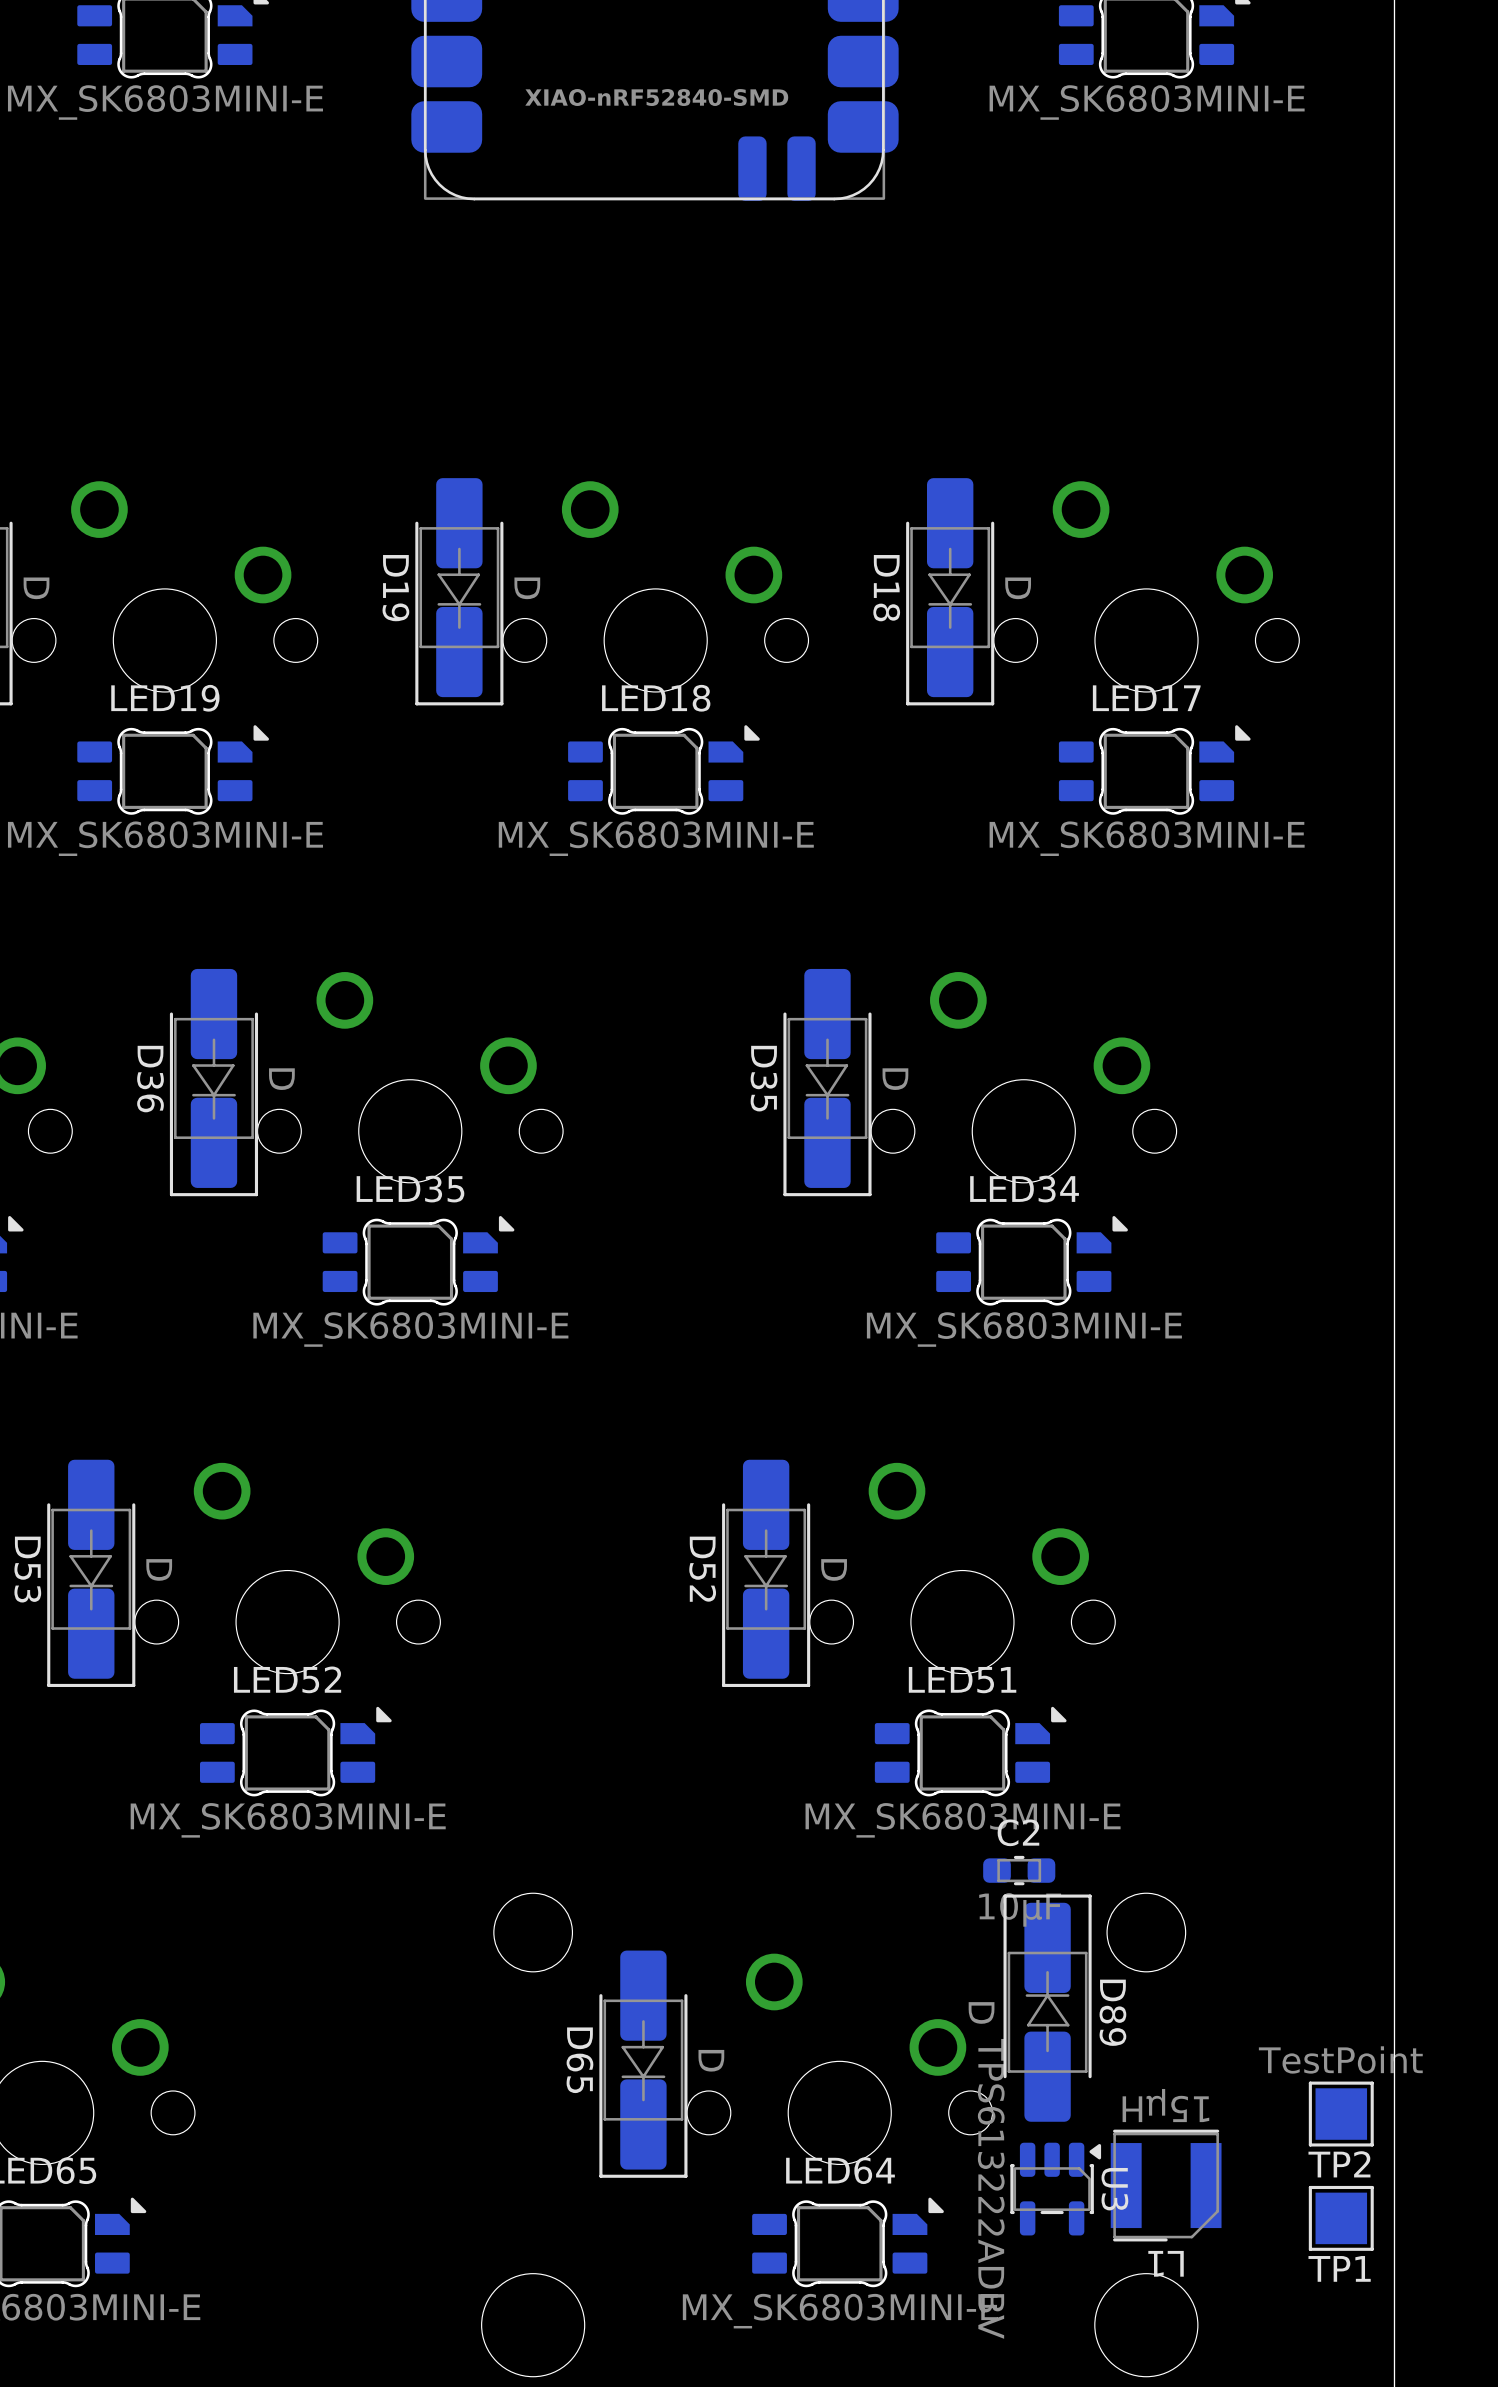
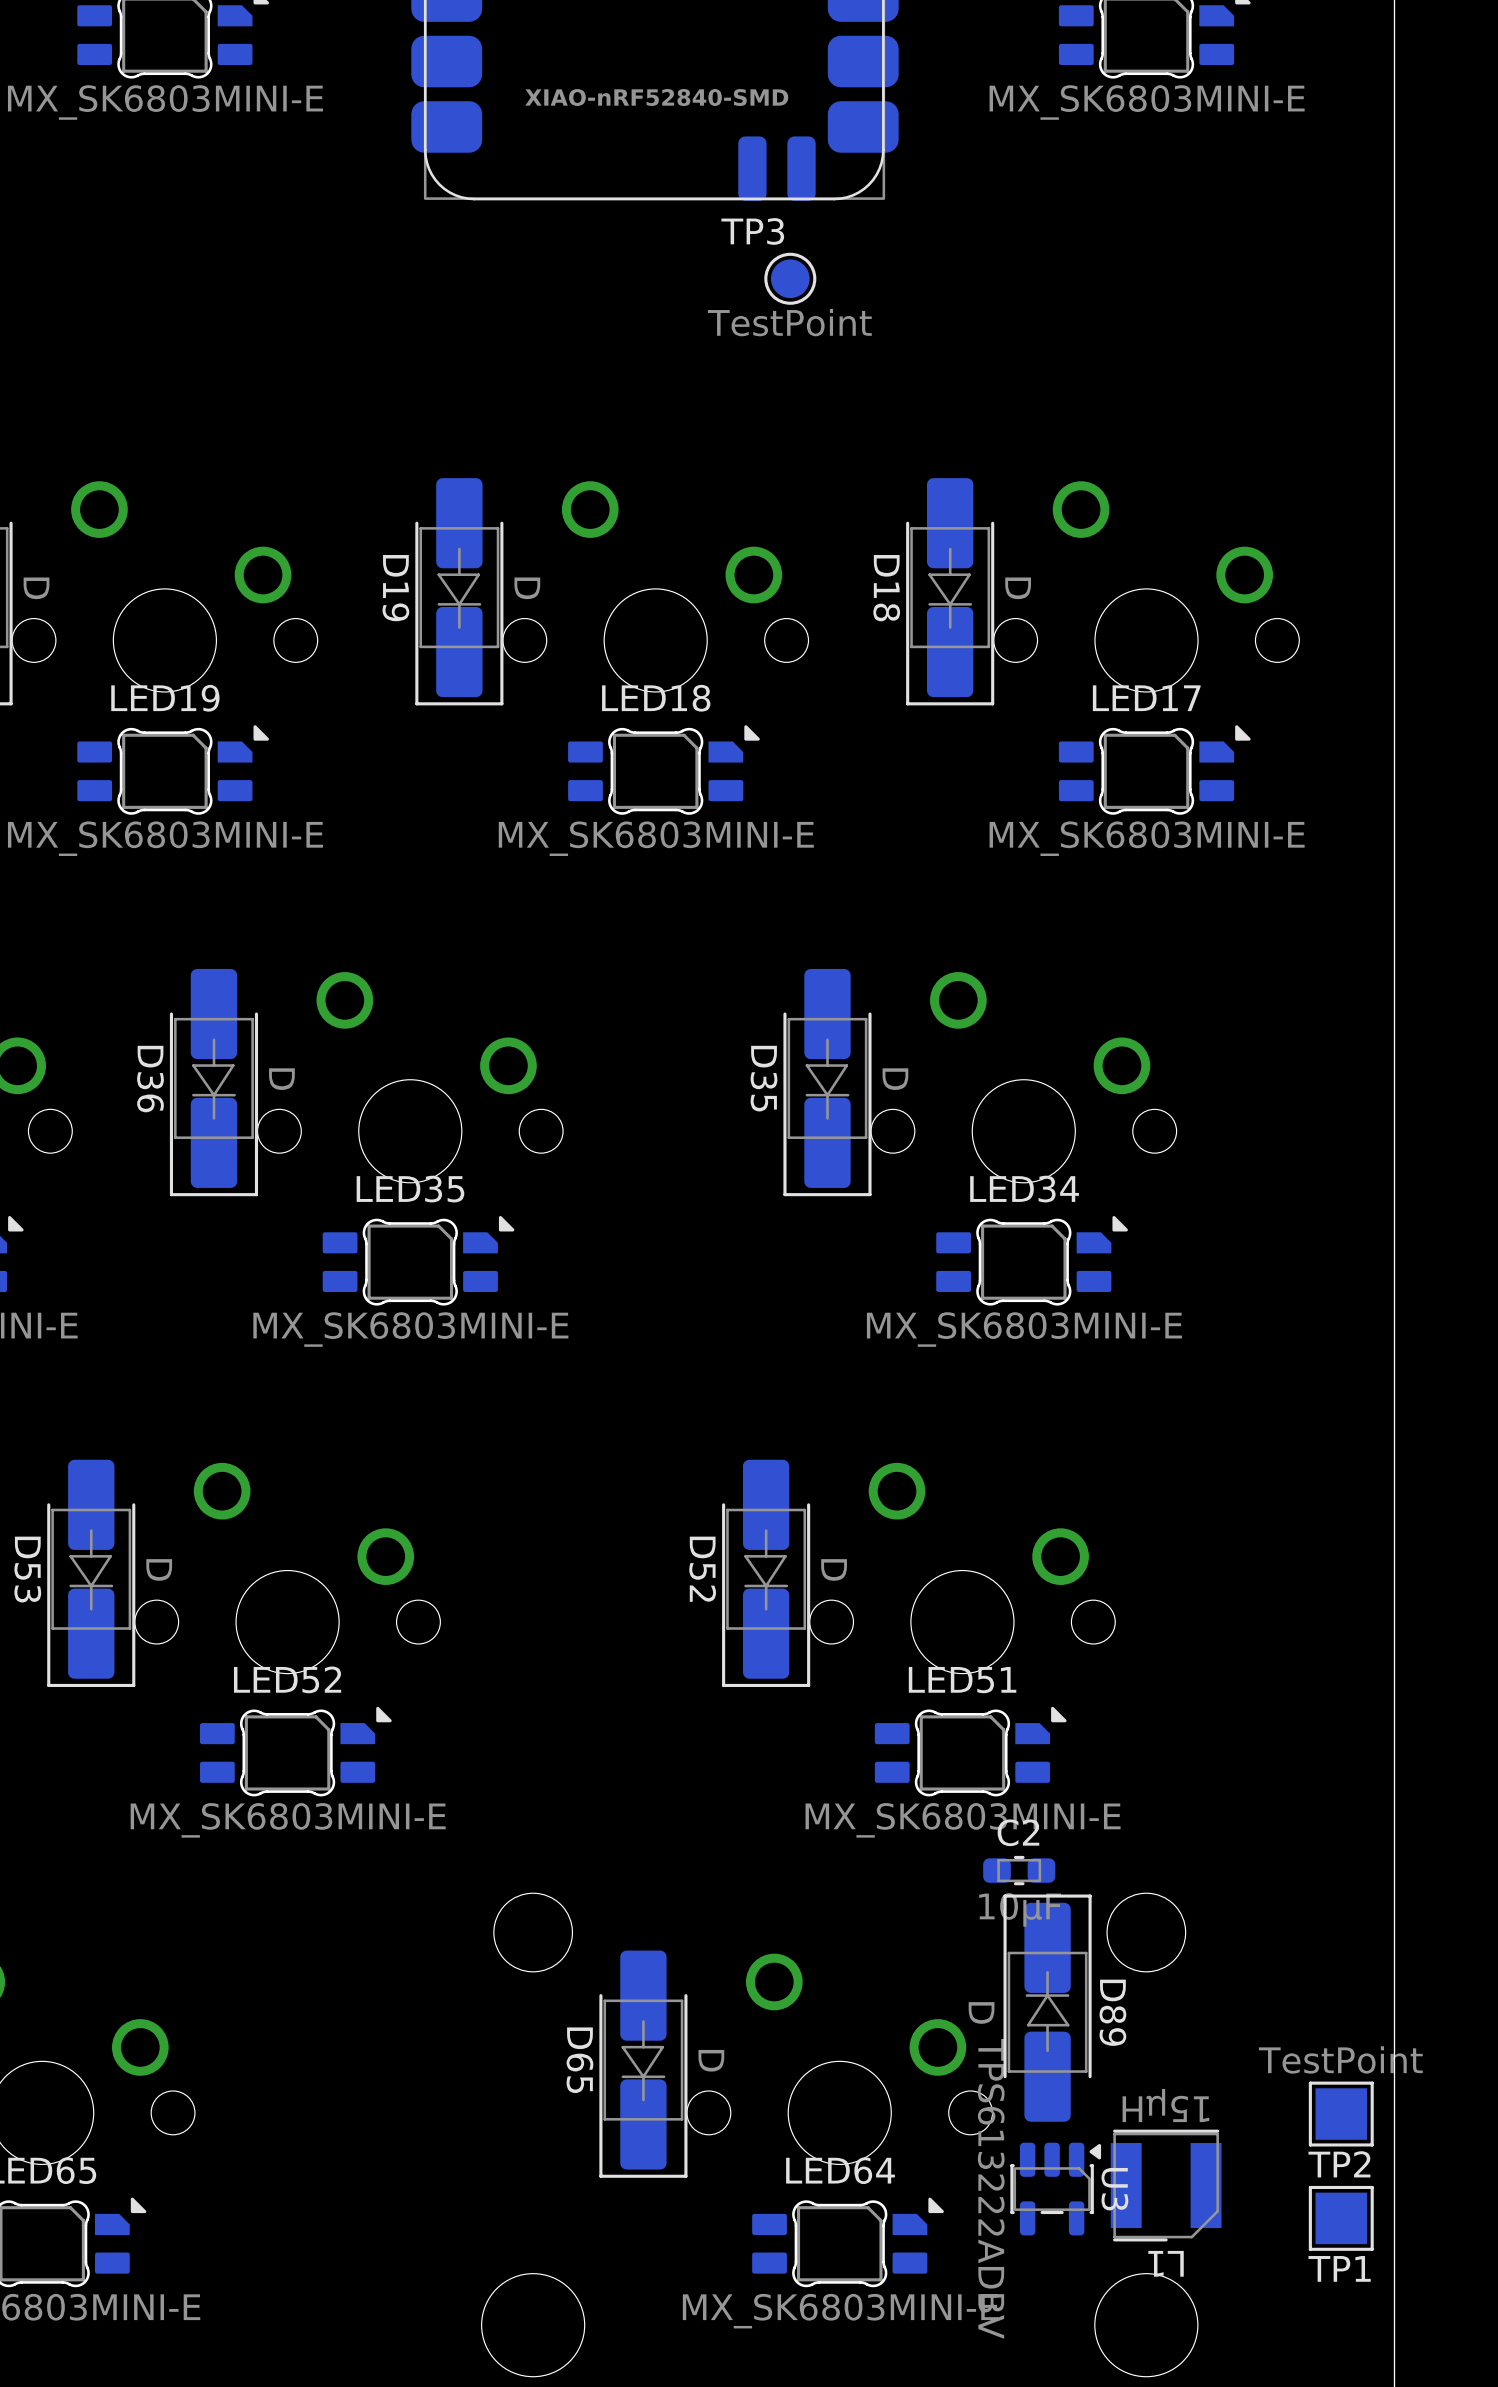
TP3: none -> TestPoint (790, 278)

